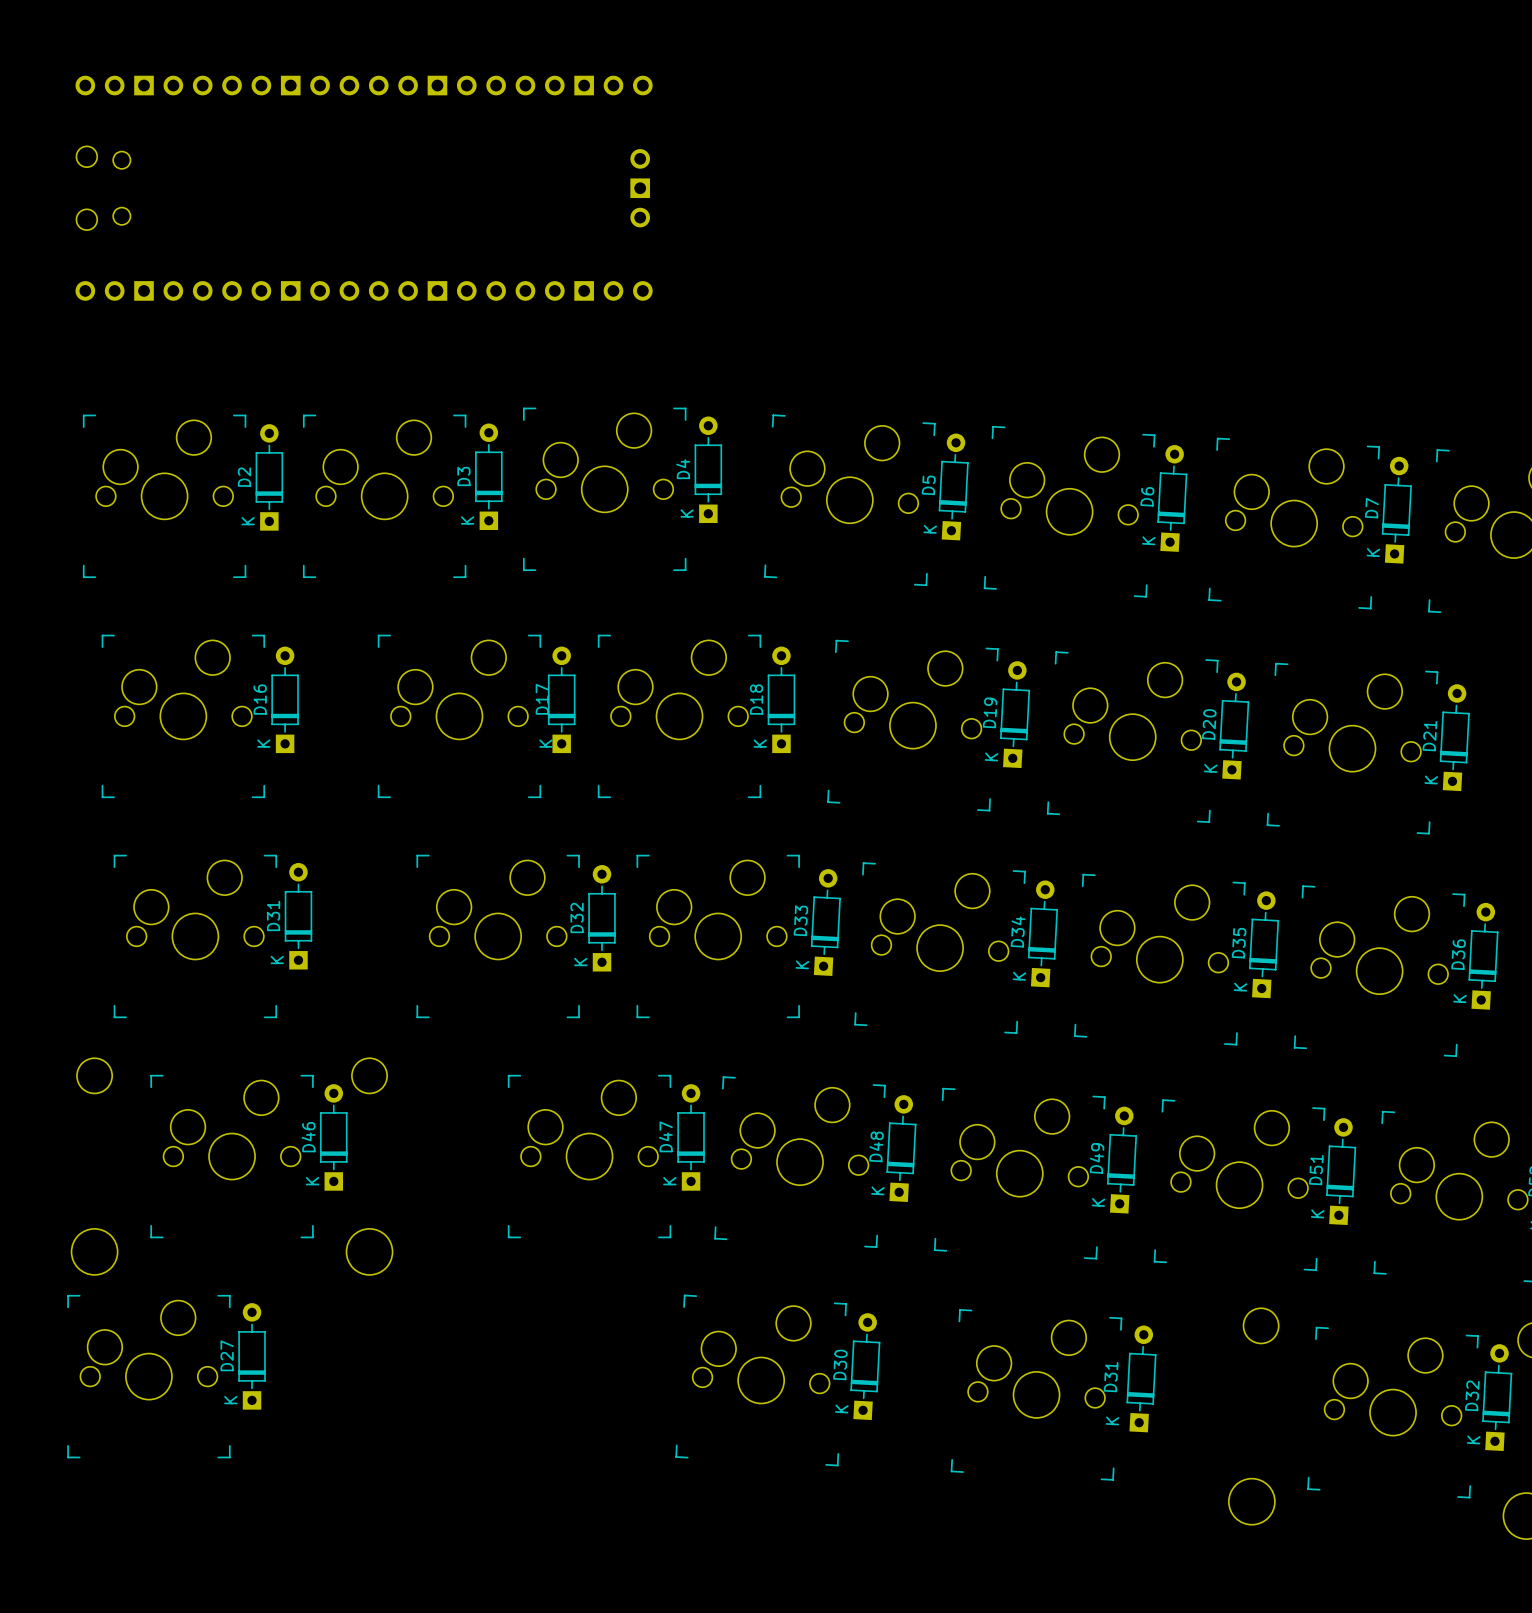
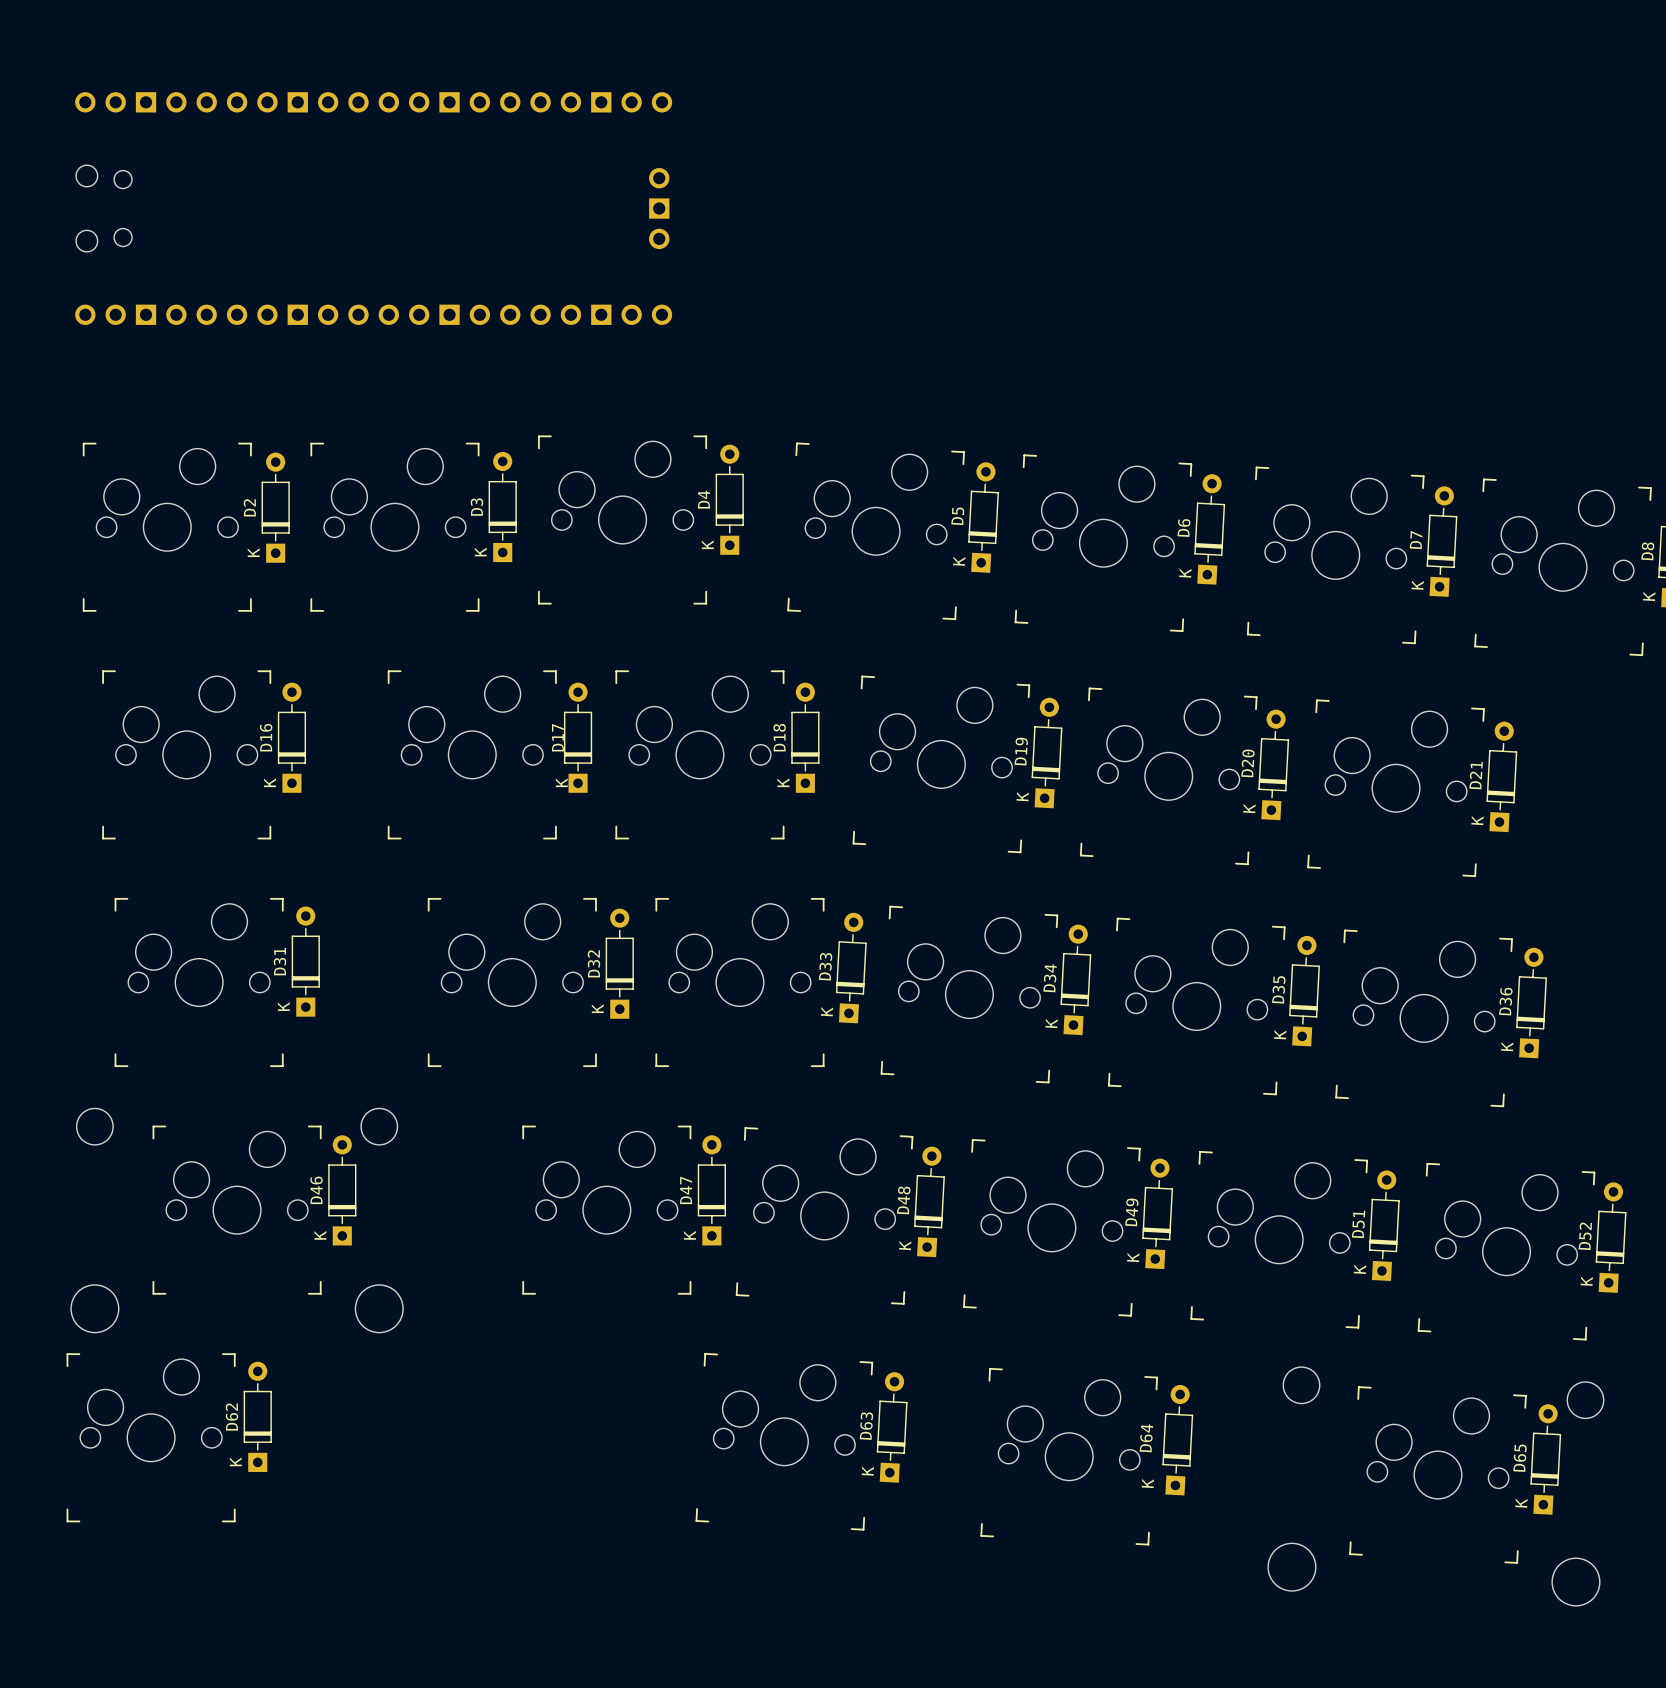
D27 name: D27 (227, 1355) -> D62 (231, 1417)
D30 name: D30 (840, 1364) -> D63 (866, 1426)
D31 name: D31 (1111, 1377) -> D64 (1146, 1438)
D32 name: D32 (1472, 1395) -> D65 (1520, 1458)

